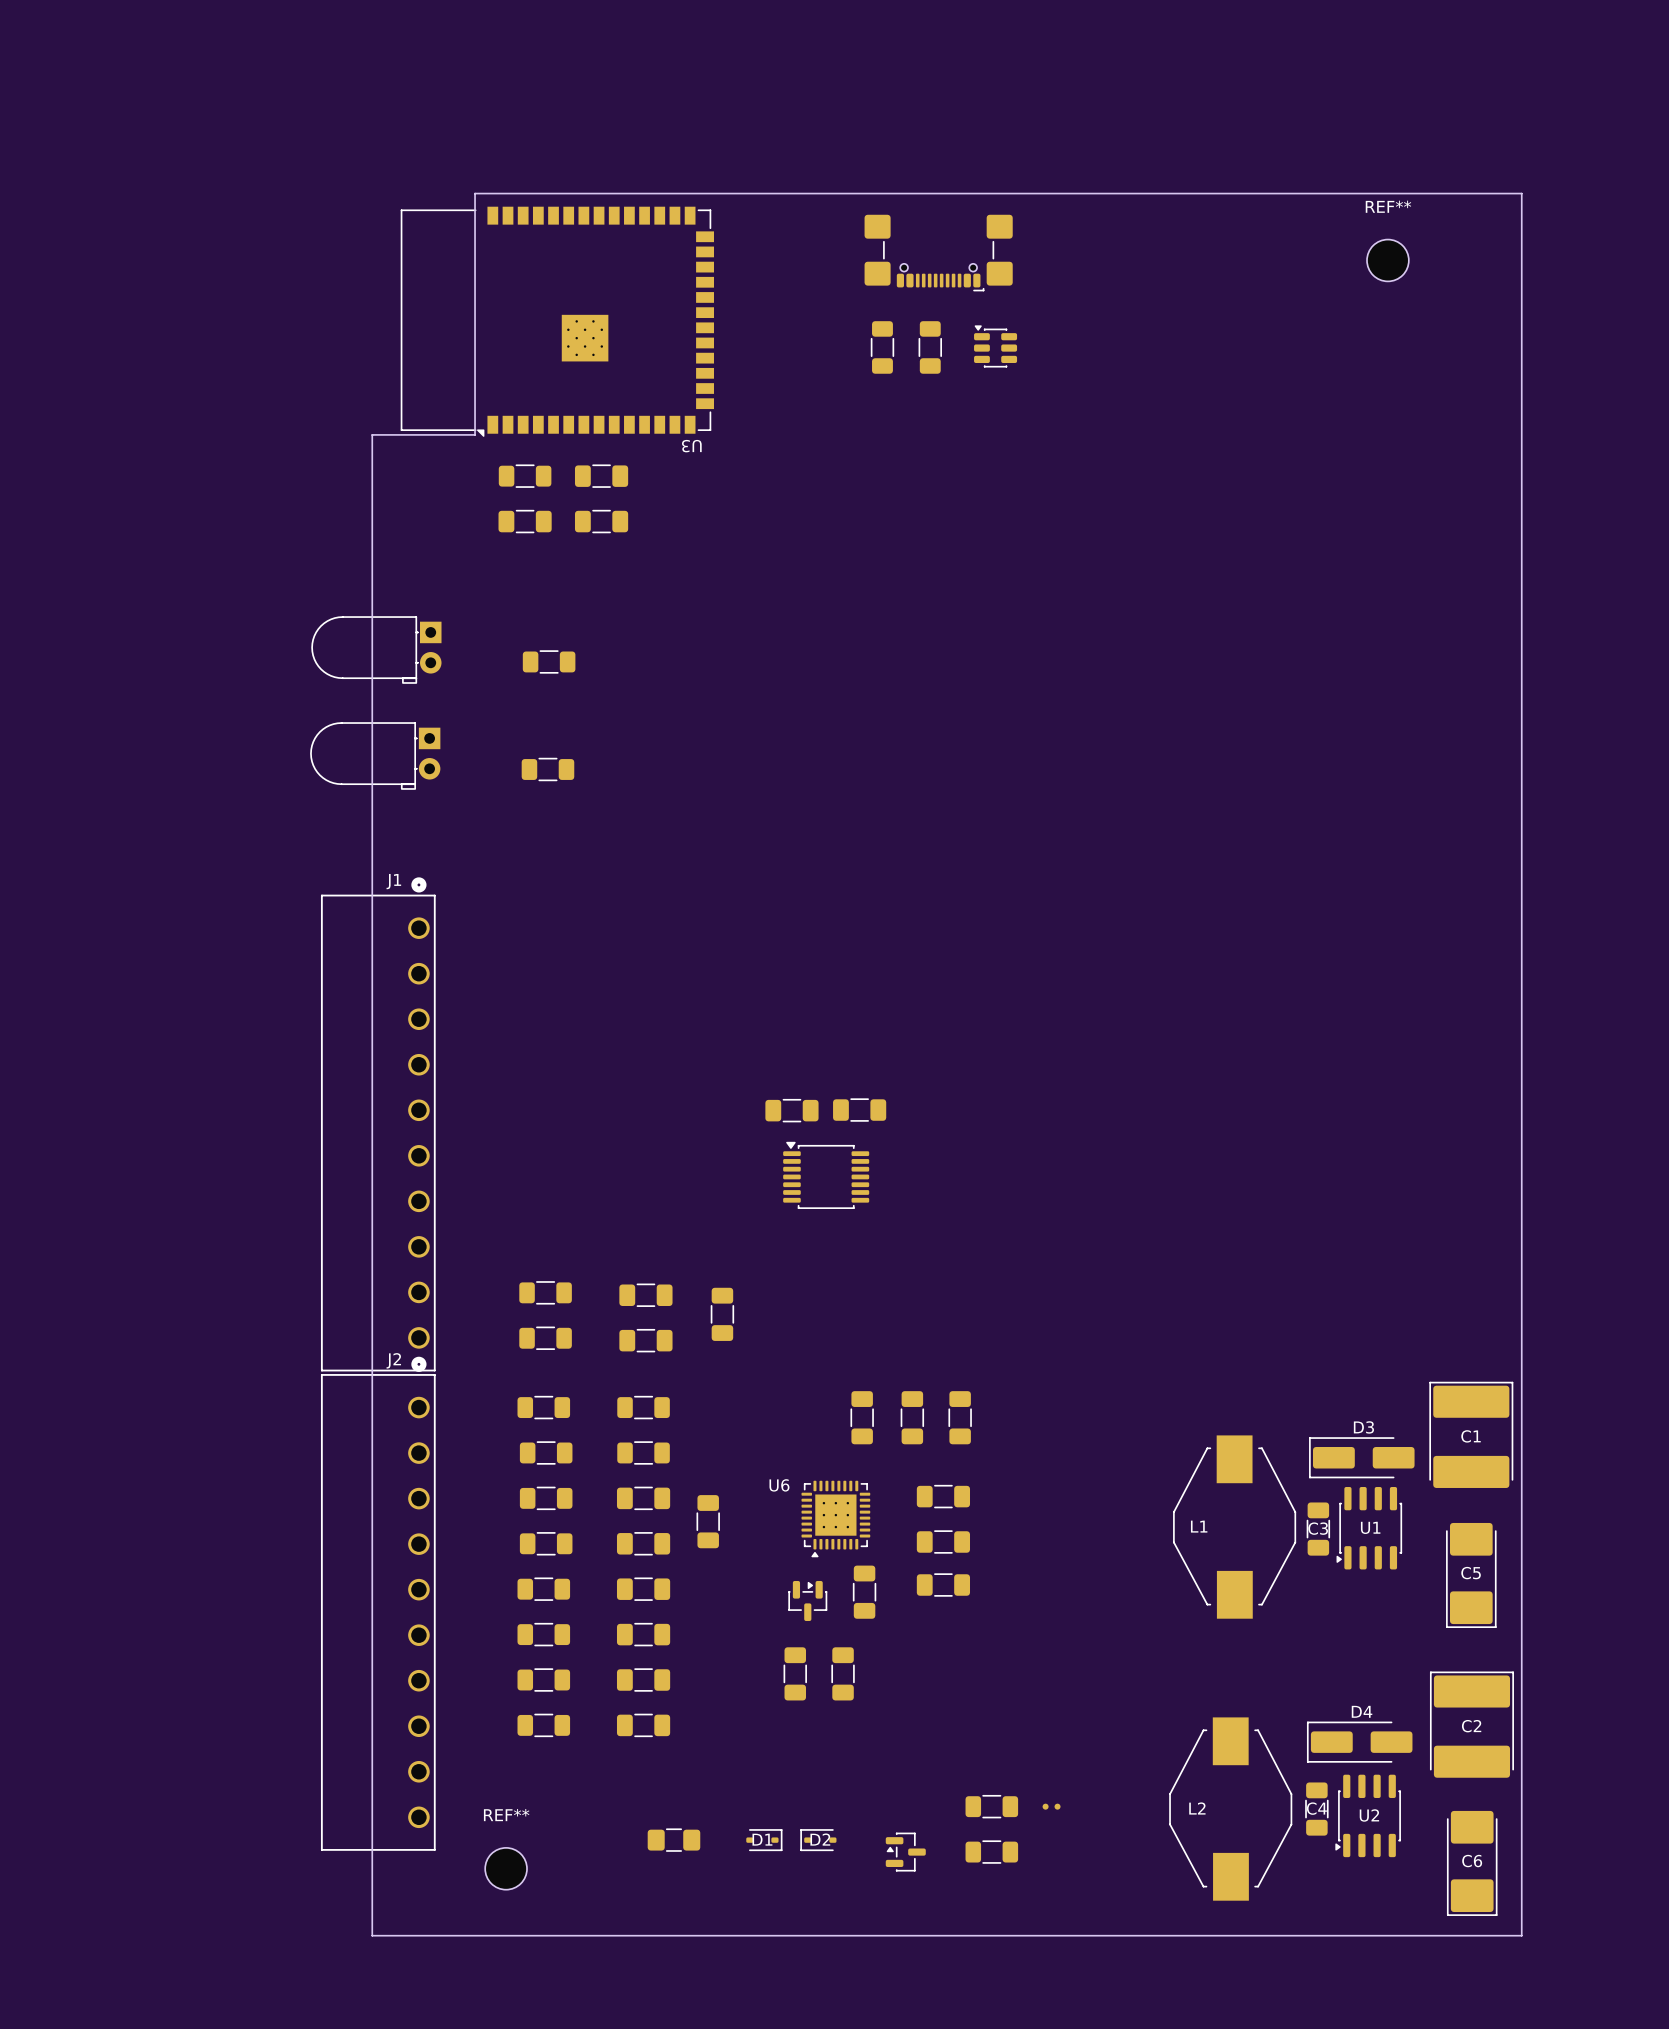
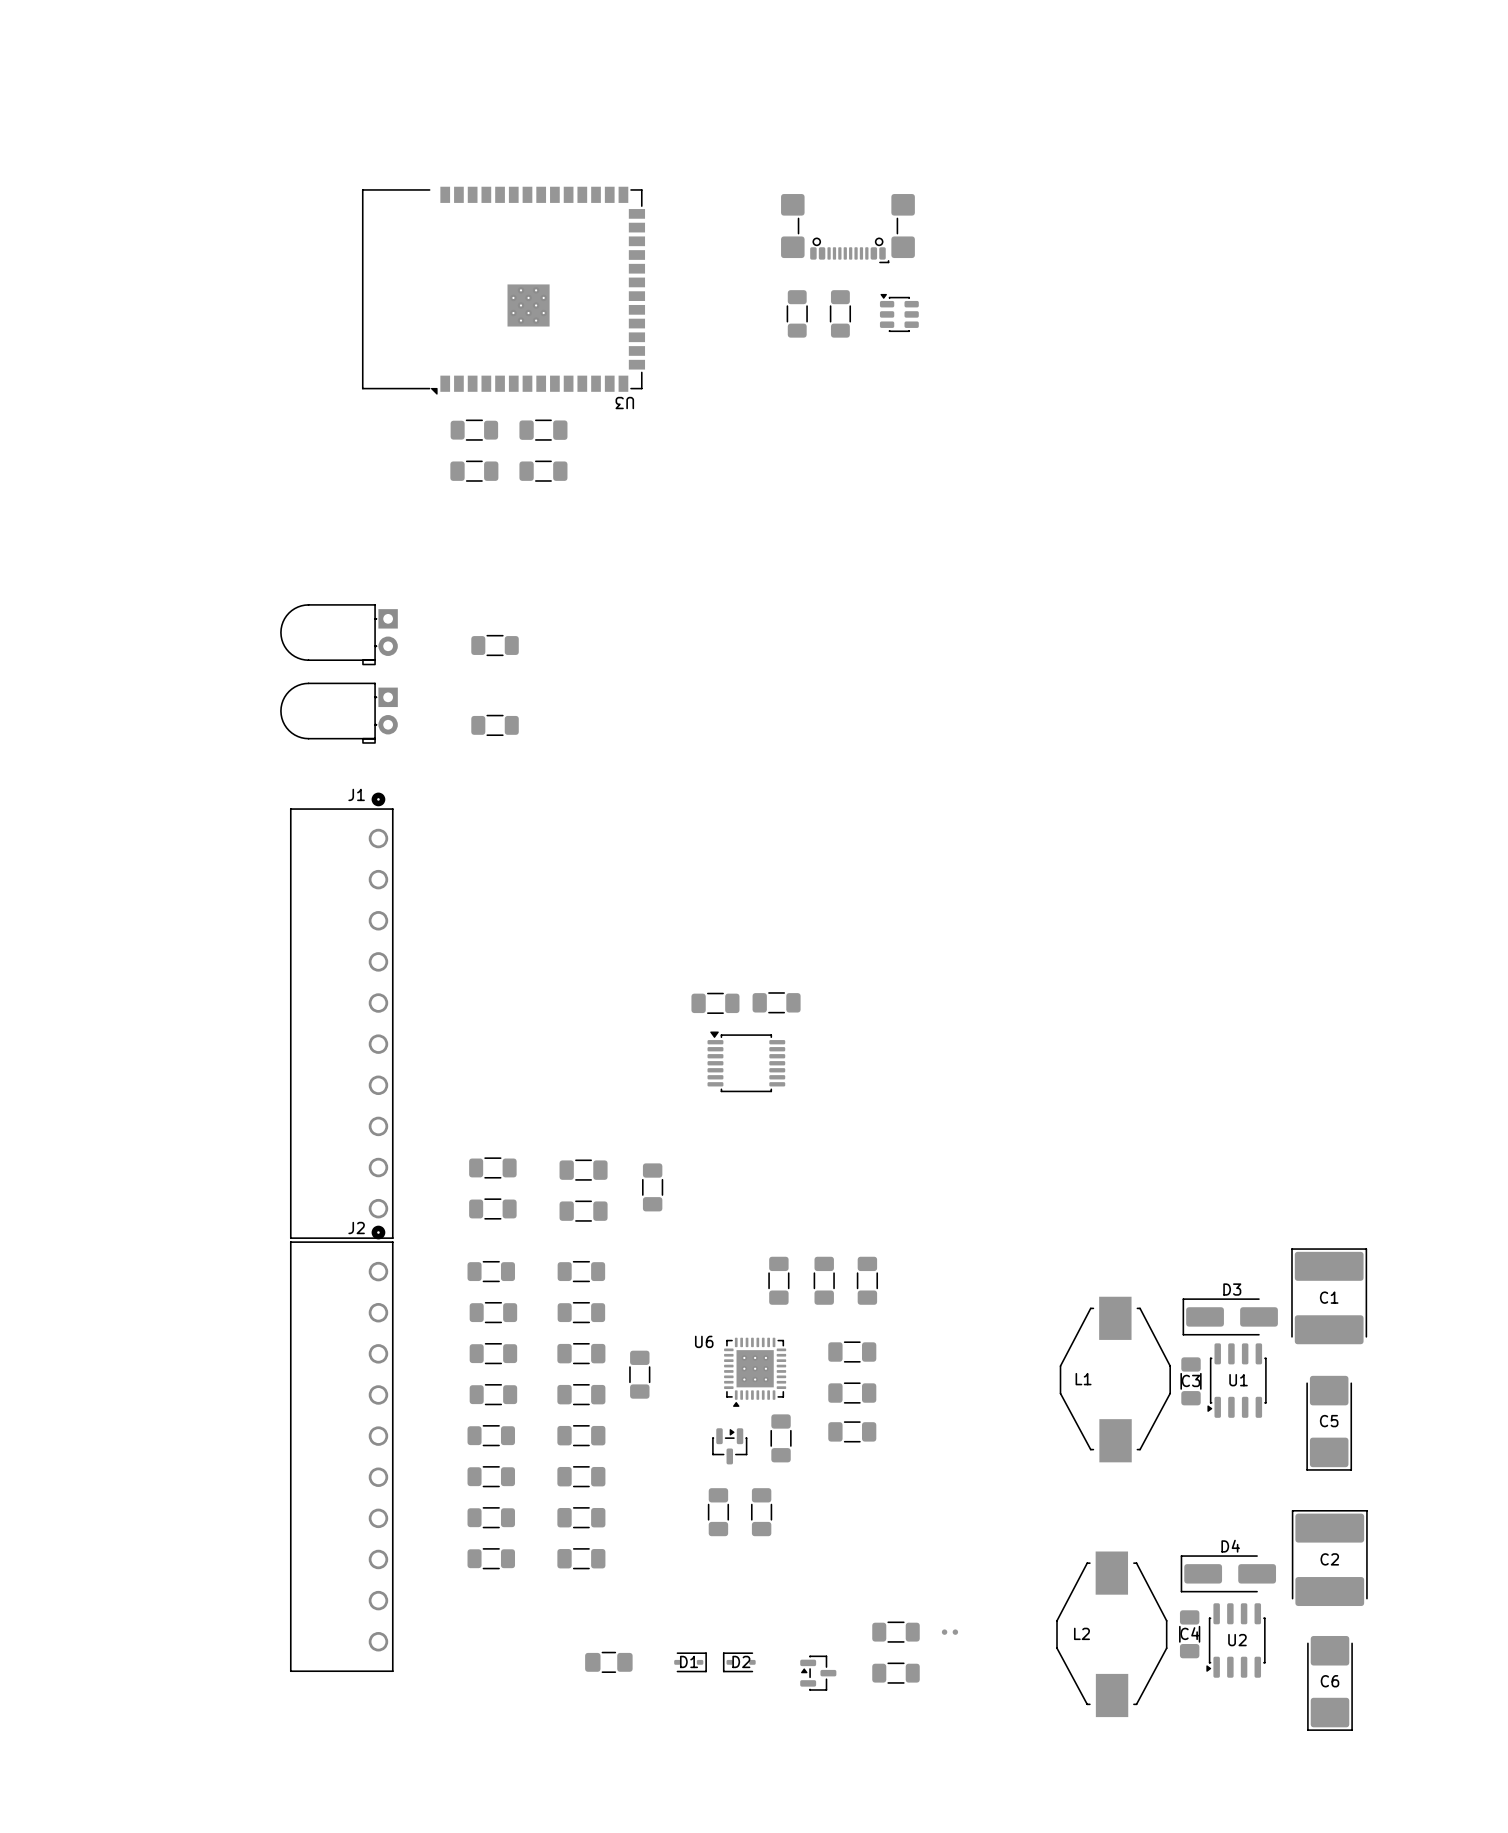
board edge: (475, 193) (475, 434) (372, 434) (372, 1935) (1521, 1935) (1521, 193) (475, 193) -> none
REF**: (1387, 260) -> none
part: (376, 650) -> none
part: (549, 661) -> none
part: none -> (339, 634)
part: none -> (495, 645)
part: (375, 755) -> none
part: (547, 769) -> none
part: none -> (339, 713)
part: none -> (495, 725)
REF**: (506, 1868) -> none

